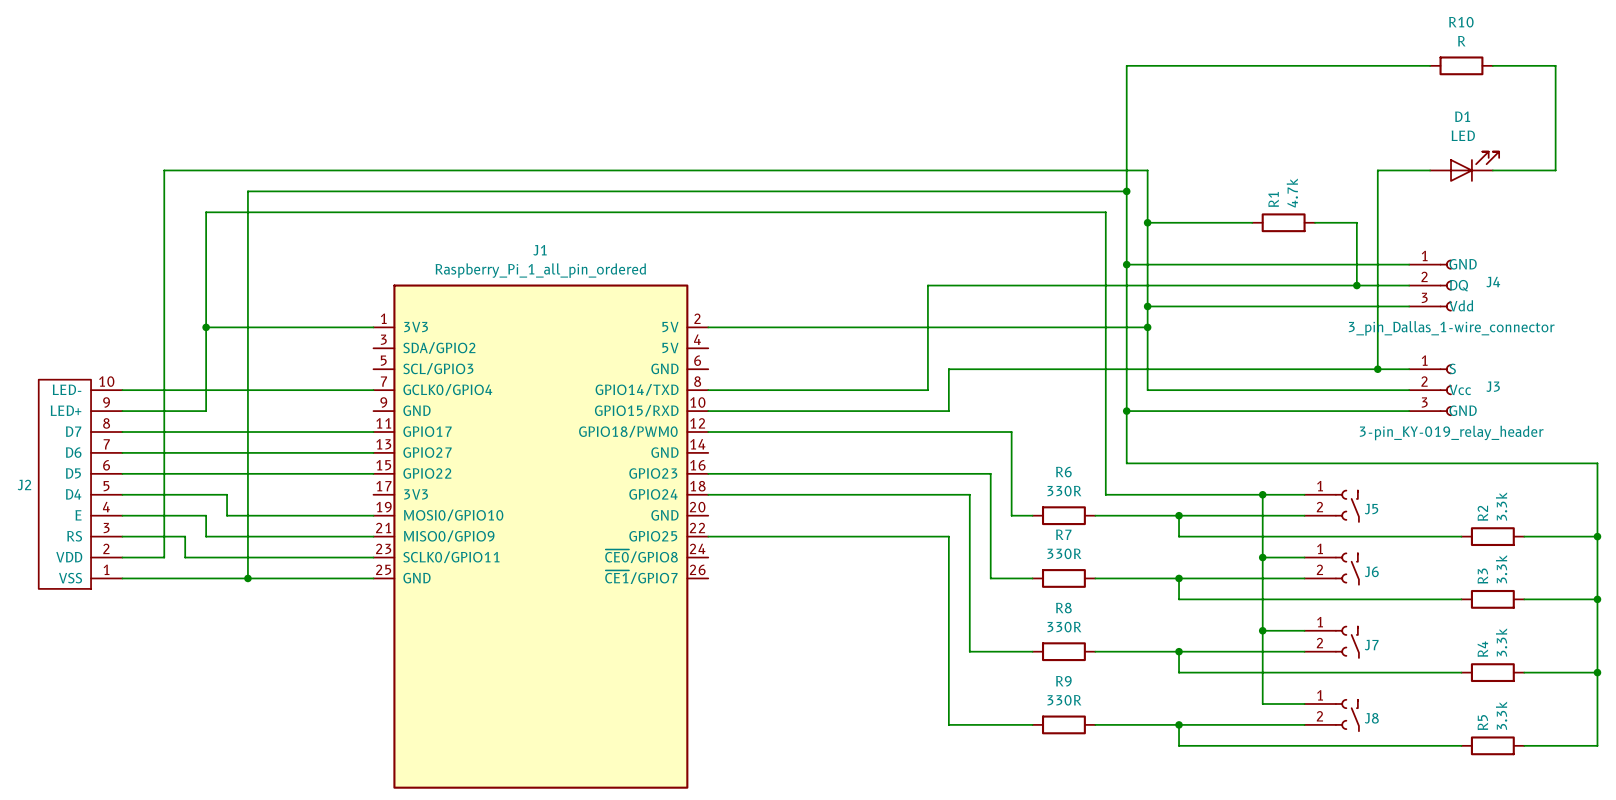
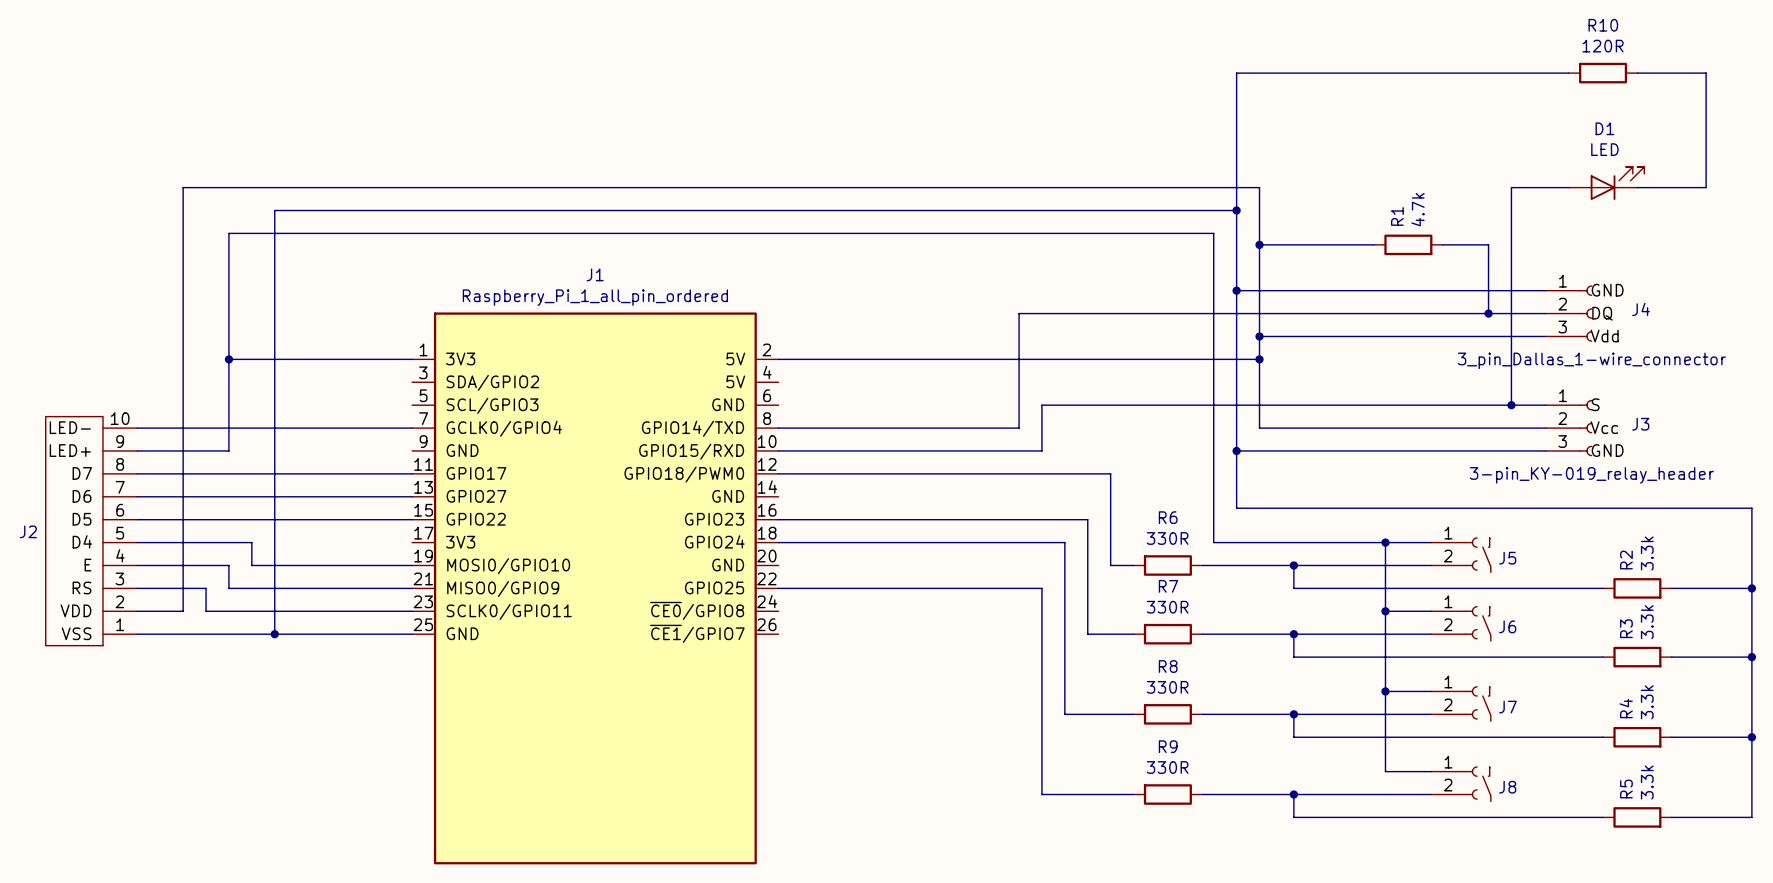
R10 value: R (1461, 41) -> 120R (1603, 46)

